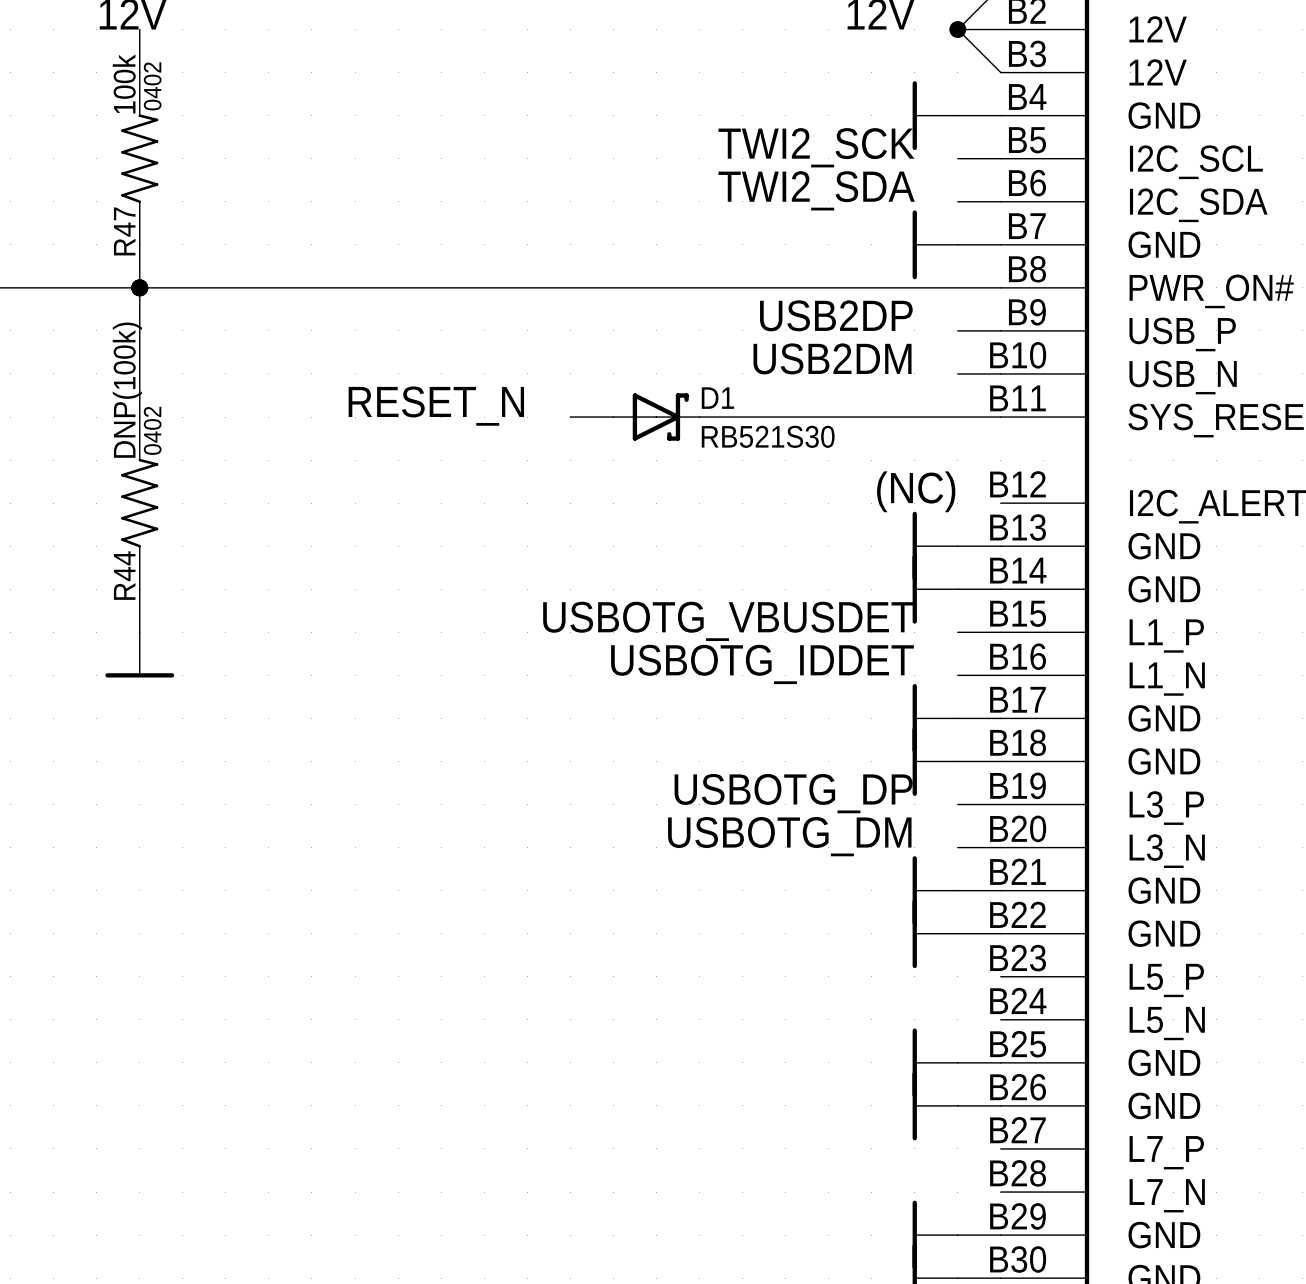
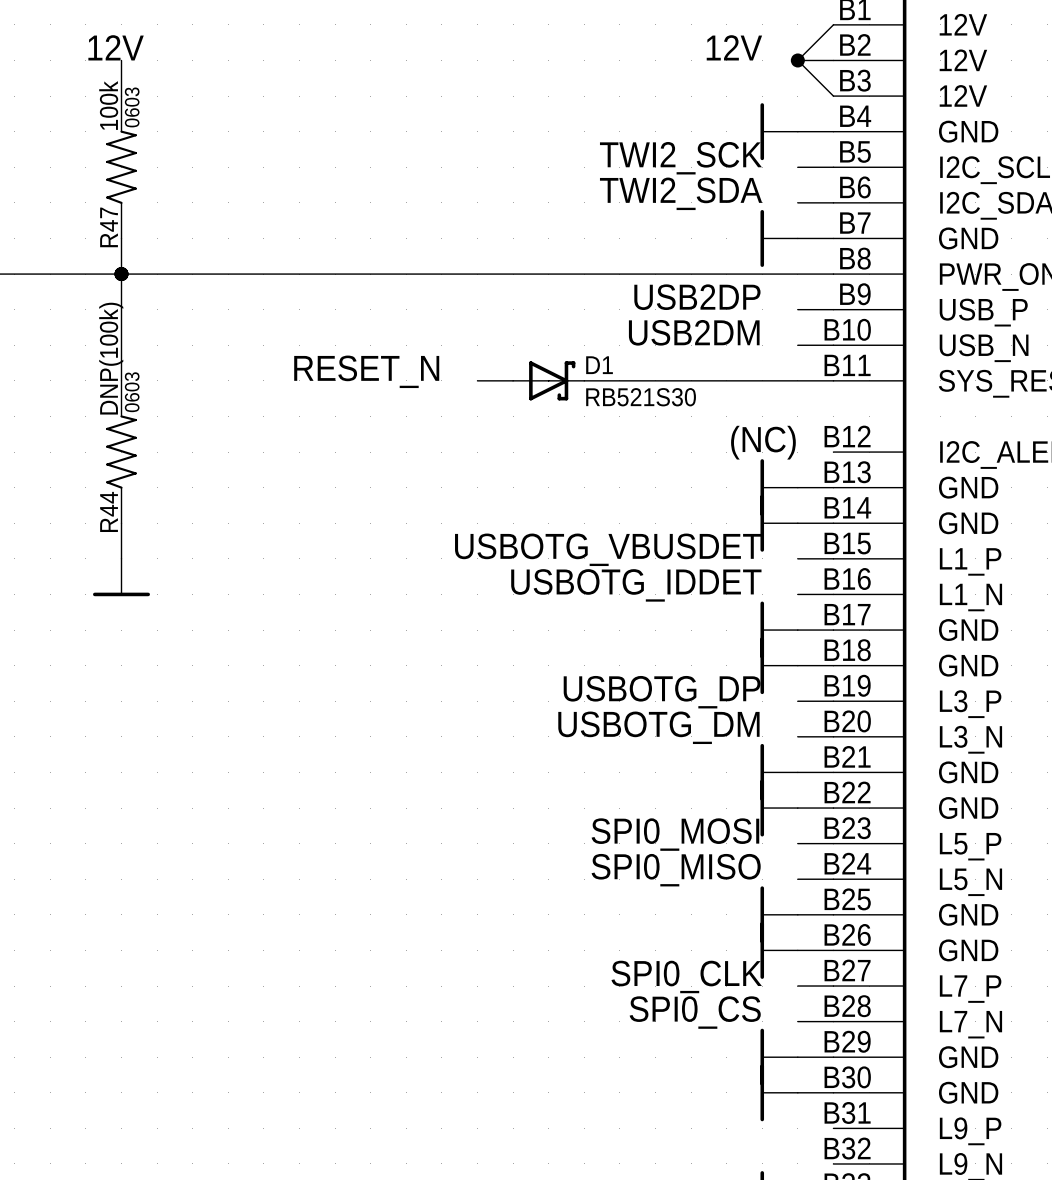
R47 text: 0402 (152, 86) -> 0603 (132, 107)
R44 text: 0402 (152, 430) -> 0603 (132, 392)
label: none -> SPI0_MOSI (675, 834)
wire: none -> (797, 843) (833, 843)
label: none -> SPI0_MISO (676, 870)
wire: none -> (797, 879) (833, 879)
label: none -> SPI0_CLK (686, 976)
wire: none -> (797, 986) (833, 986)
label: none -> SPI0_CS (695, 1012)
wire: none -> (797, 1021) (833, 1021)

